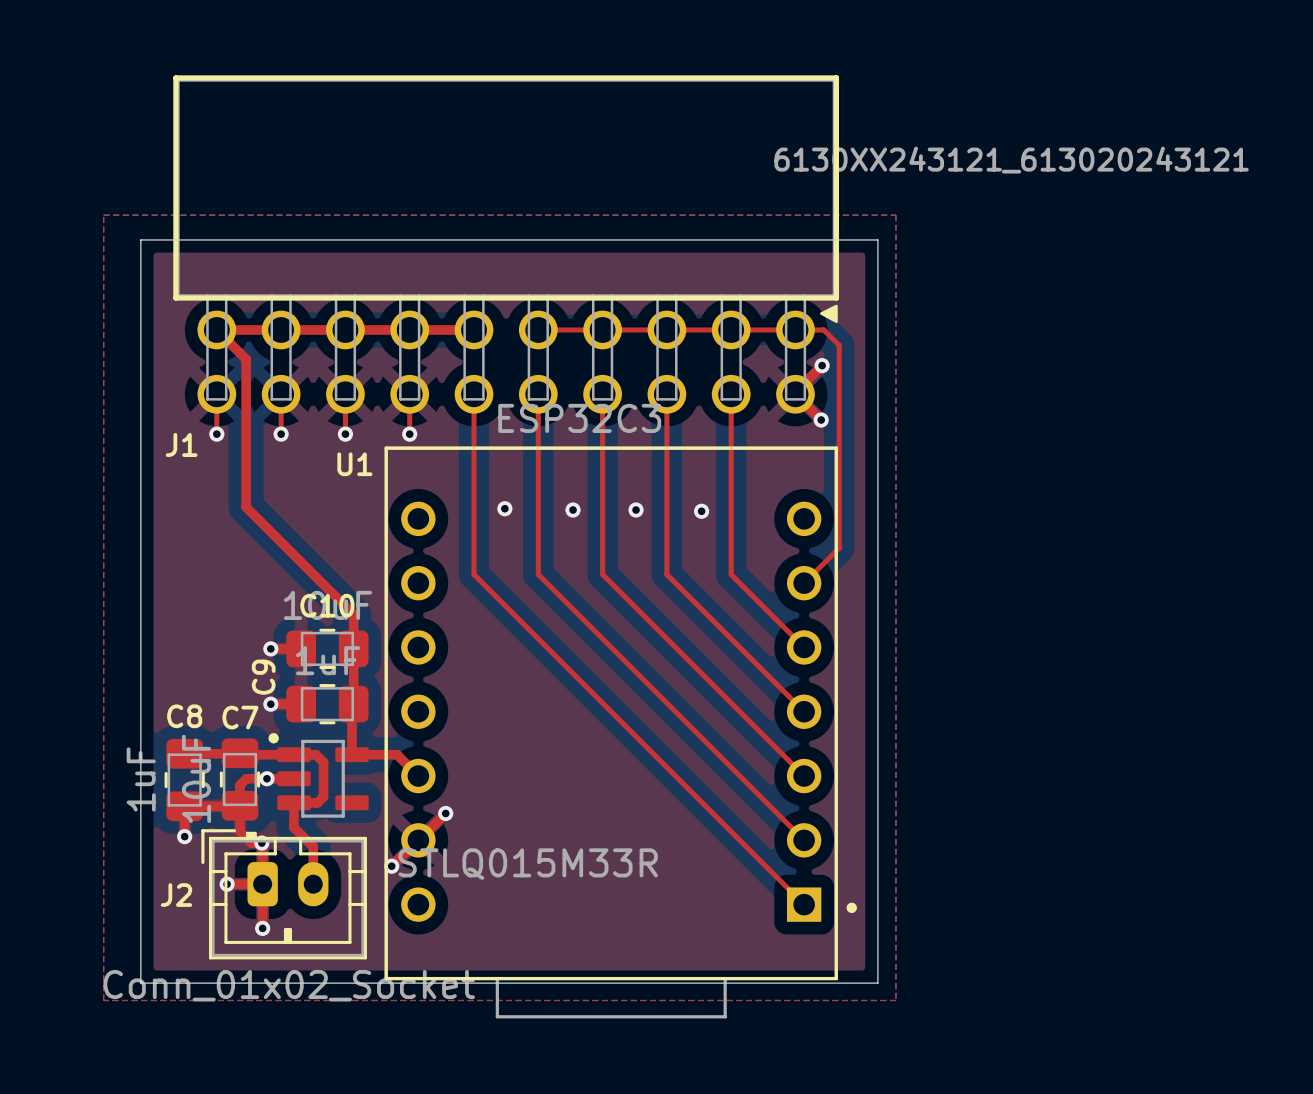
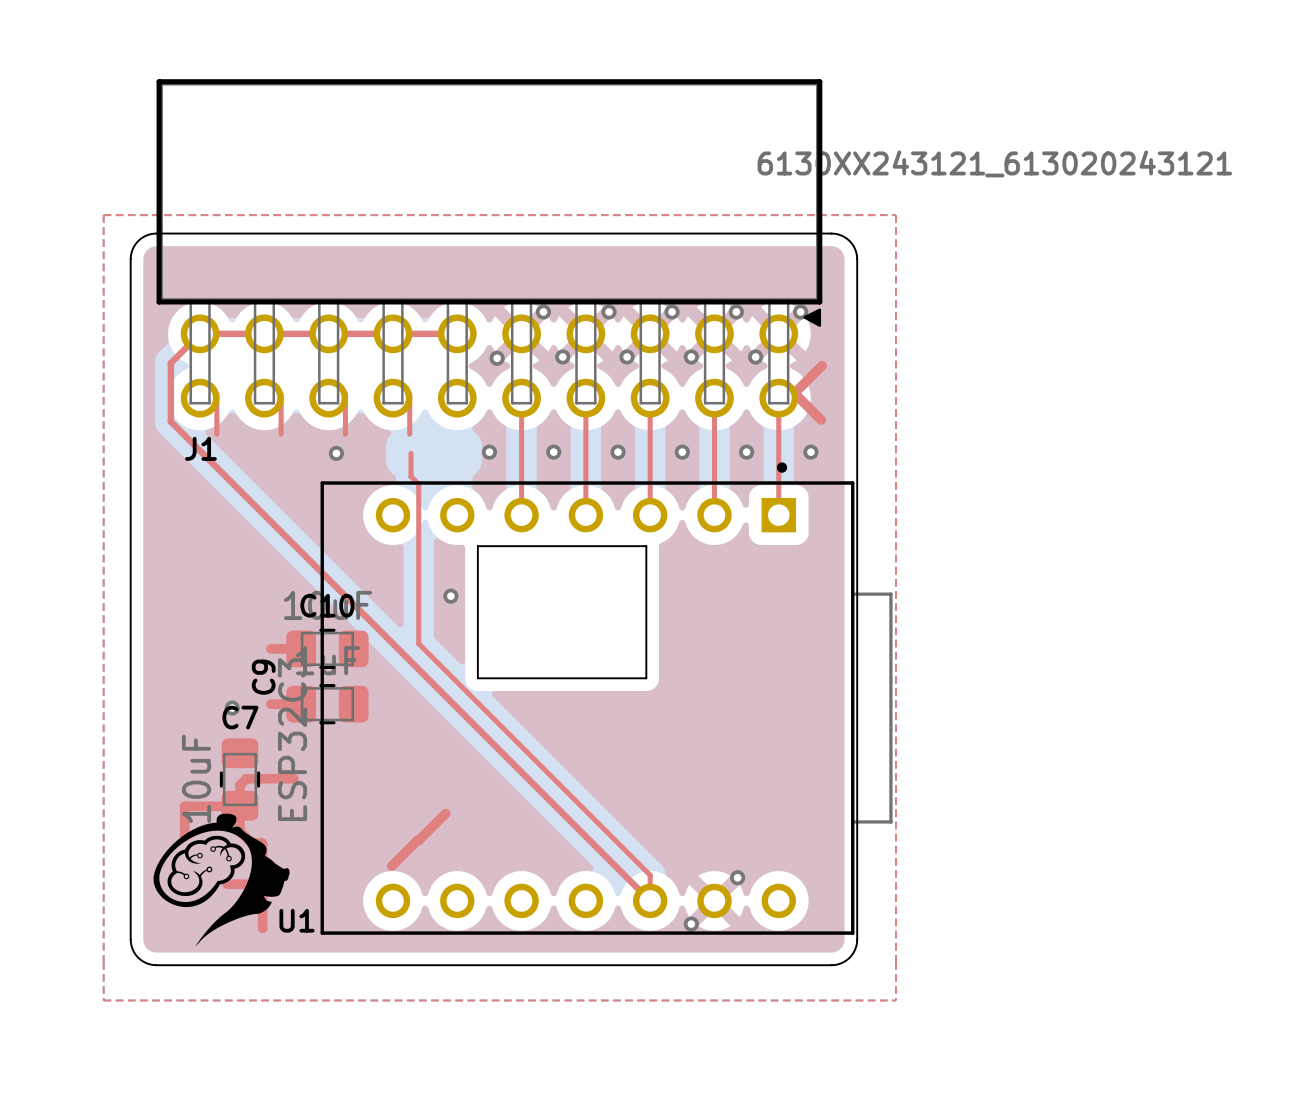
board edge: (140, 239) (877, 239) (877, 983) (140, 983) (140, 239) -> (156, 233) (146, 235) (138, 241) (132, 249) (130, 259) (130, 939) (132, 949) (138, 957) (146, 963) (156, 965) (831, 965) (841, 963) (849, 957) (855, 949) (857, 939) (857, 259) (855, 249) (849, 241) (841, 235) (831, 233) (156, 233)
J1 position: (506, 244) -> (489, 248)
via: none -> (543, 311)
via: none -> (609, 311)
via: none -> (672, 311)
via: none -> (736, 311)
via: none -> (800, 311)
top track: (474, 329) (216, 329) (246, 359) (246, 507) (353, 614) (352, 754) (397, 754) (418, 776) -> none
top track: (538, 329) (823, 329) (839, 345) (839, 548) (804, 583) -> none
top track: none -> (457, 333) (200, 333) (170, 363) (170, 421) (650, 900) (650, 875) (418, 643) (418, 484) (411, 476) (411, 453)
via: none -> (562, 356)
via: none -> (627, 356)
via: none -> (691, 356)
via: none -> (755, 356)
via: none -> (497, 358)
via: (822, 365) -> none
top track: (474, 394) (474, 574) (804, 904) -> none
top track: (538, 394) (538, 574) (804, 840) -> none
top track: (602, 394) (602, 574) (804, 776) -> none
top track: (666, 394) (666, 574) (804, 711) -> none
top track: (731, 394) (731, 574) (804, 647) -> none
top track: none -> (521, 398) (521, 515)
top track: none -> (585, 398) (585, 515)
top track: none -> (650, 398) (650, 515)
top track: none -> (714, 398) (714, 515)
top track: none -> (778, 398) (778, 515)
via position: (821, 420) -> (810, 452)
via: (216, 434) -> none
via: (281, 434) -> none
via position: (345, 434) -> (336, 453)
via: (409, 434) -> none
J1 name position: J1 (181, 444) -> J1 (200, 448)
via: none -> (489, 452)
via: none -> (553, 452)
via: none -> (618, 452)
via: none -> (682, 452)
via: none -> (746, 452)
U1 name position: U1 (354, 464) -> U1 (297, 920)
via: (504, 508) -> none
via: (573, 510) -> none
via: (636, 510) -> none
via: (701, 511) -> none
board edge: none -> (477, 546) (646, 546) (646, 678) (477, 678) (477, 546)
via: none -> (450, 596)
via: (270, 648) -> none
via: (270, 704) -> none
via: none -> (232, 708)
U1 rotation: 0° (620, 732) -> 90° counterclockwise (606, 698)
top track: (184, 753) (315, 754) (323, 762) (323, 796) (317, 802) (294, 802) -> none
part: STLQ015M33R (318, 775) -> none
via: (266, 778) -> none
C8: 1uF (184, 780) -> none
top track: (293, 802) (293, 827) (313, 846) (313, 884) -> none
drawing: none -> [153, 813, 290, 947]
via: (445, 813) -> none
via: (184, 836) -> none
via: (261, 843) -> none
via: (391, 866) -> none
via: none -> (737, 877)
via: (227, 884) -> none
J2: Conn_01x02_Socket (284, 894) -> none
via: none -> (691, 924)
via: (262, 928) -> none

